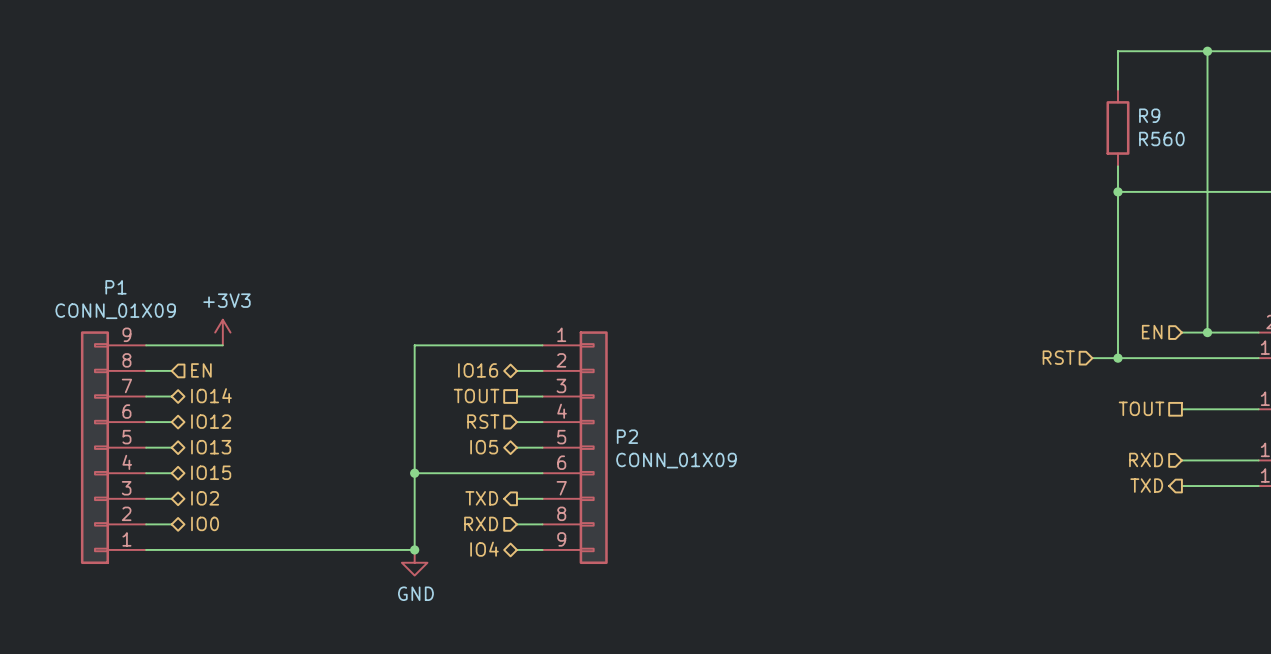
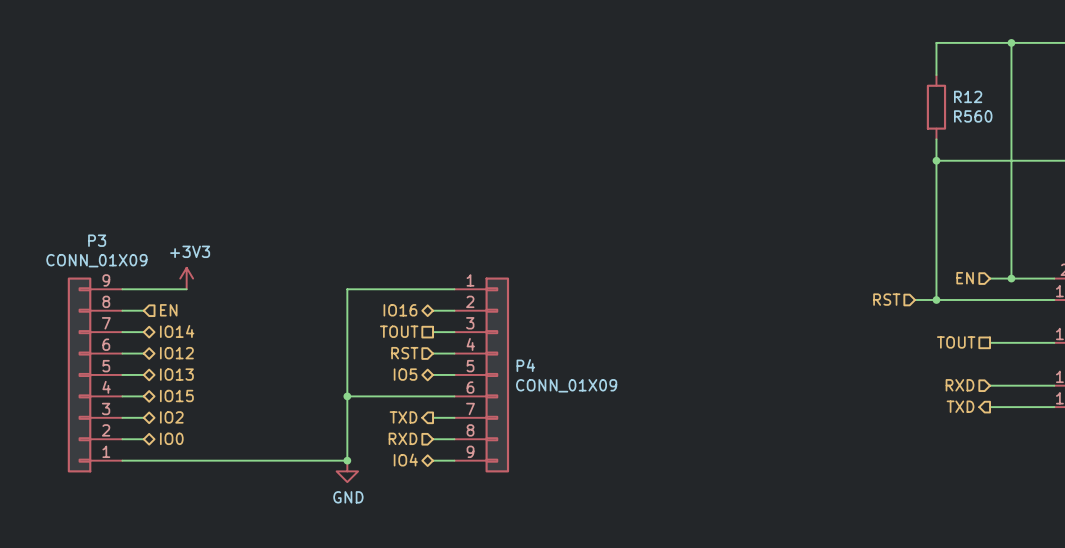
R9 name: R9 (1149, 115) -> R12 (968, 96)
P1 name: P1 (115, 287) -> P3 (97, 240)
P2 name: P2 (627, 436) -> P4 (525, 365)

